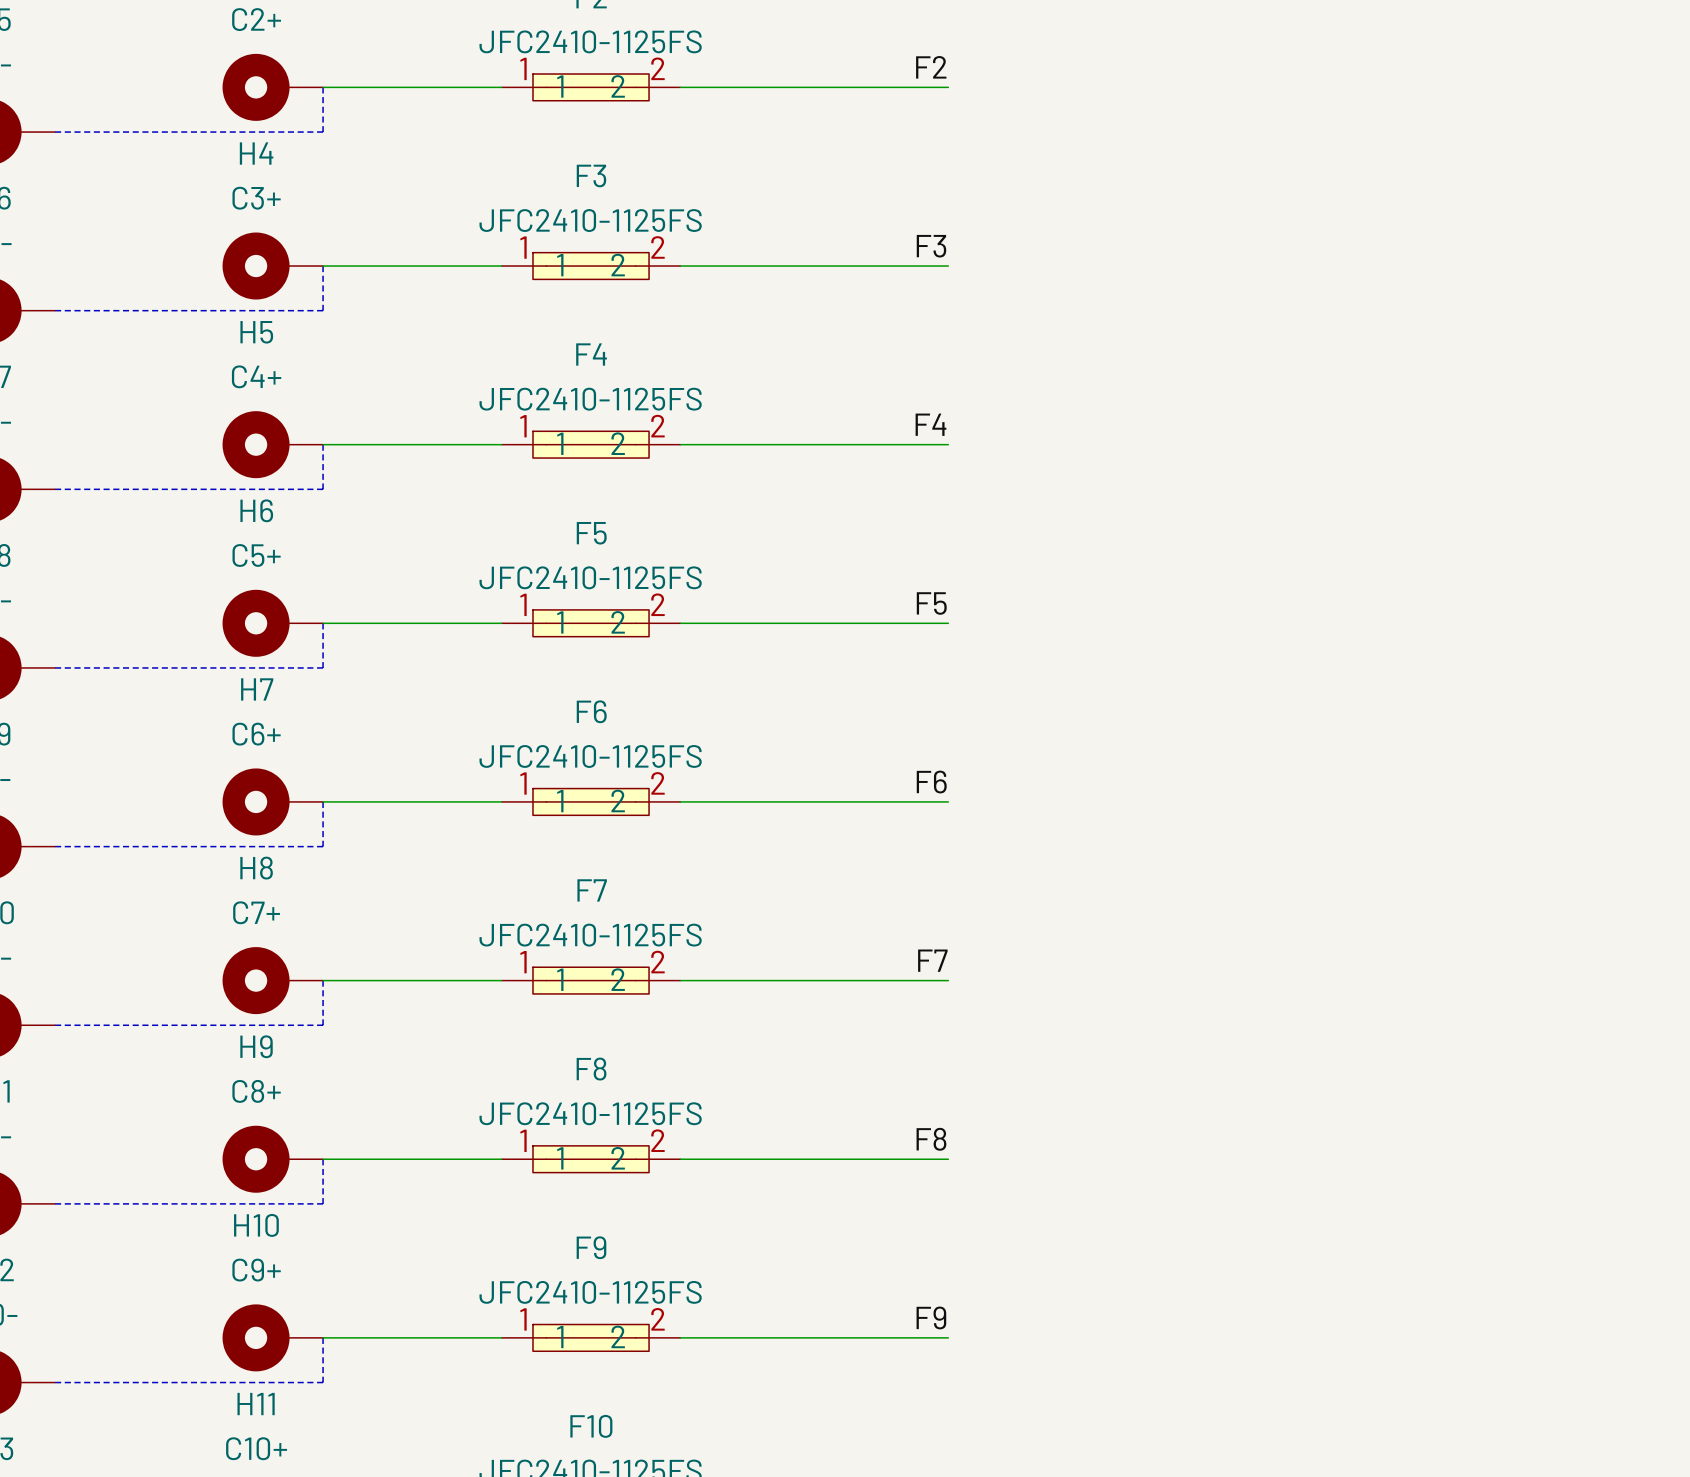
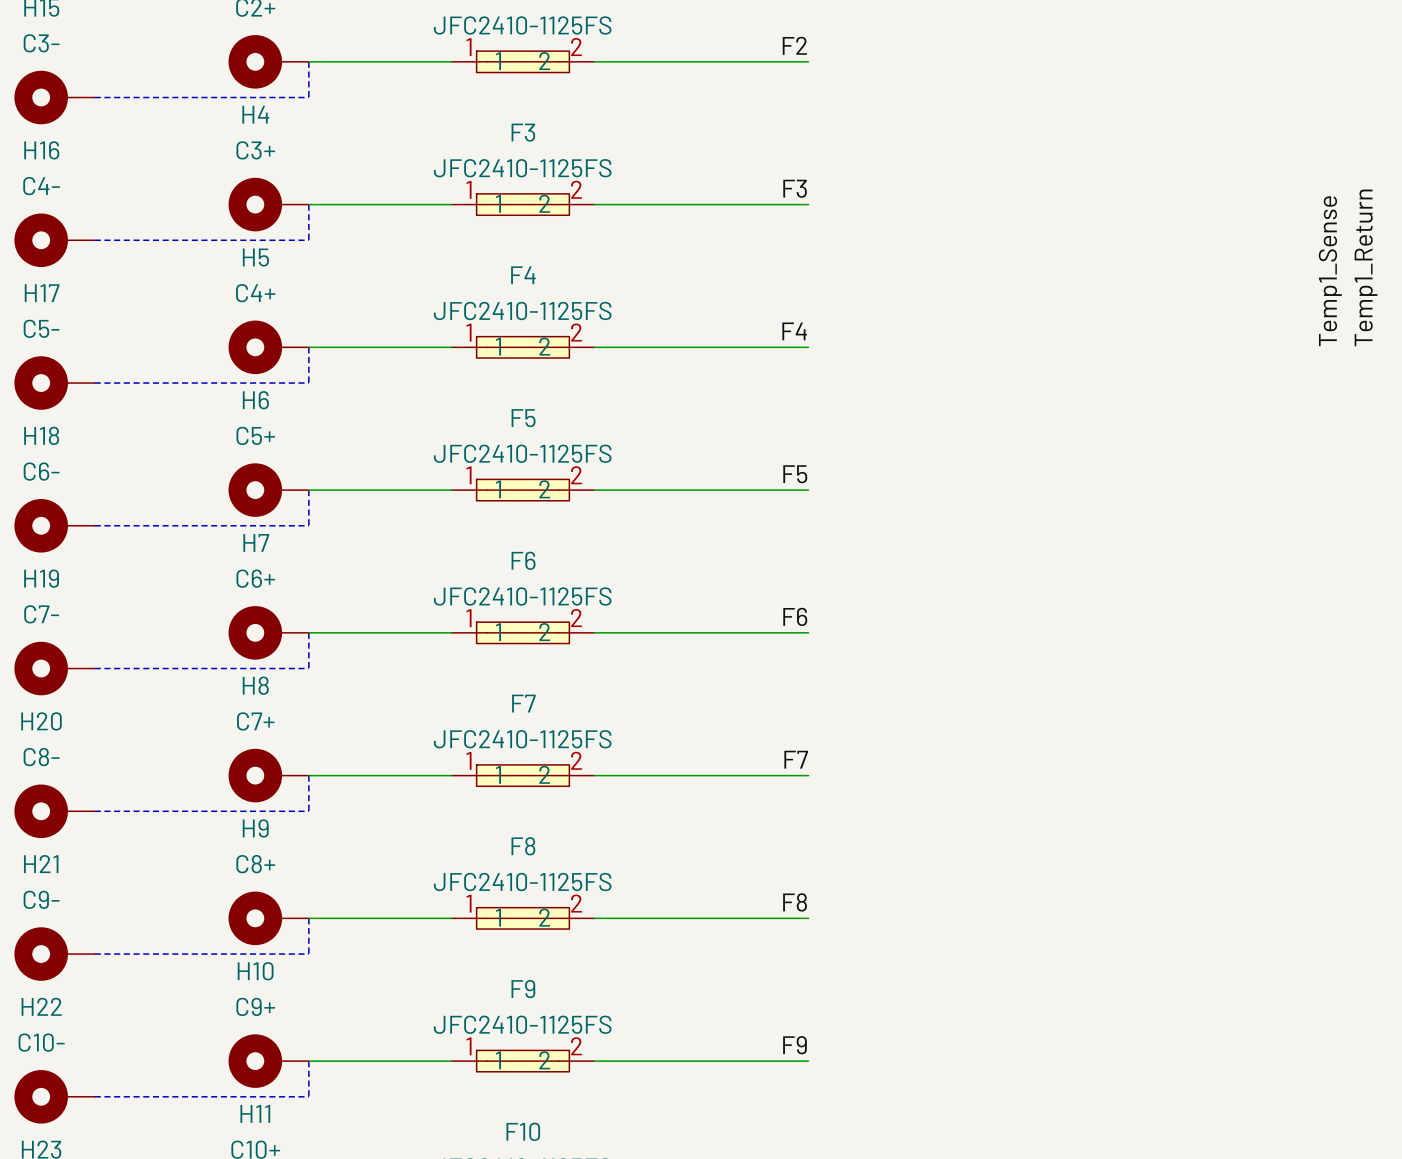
label: none -> Temp1_Return (1366, 267)
label: none -> Temp1_Sense (1330, 271)

